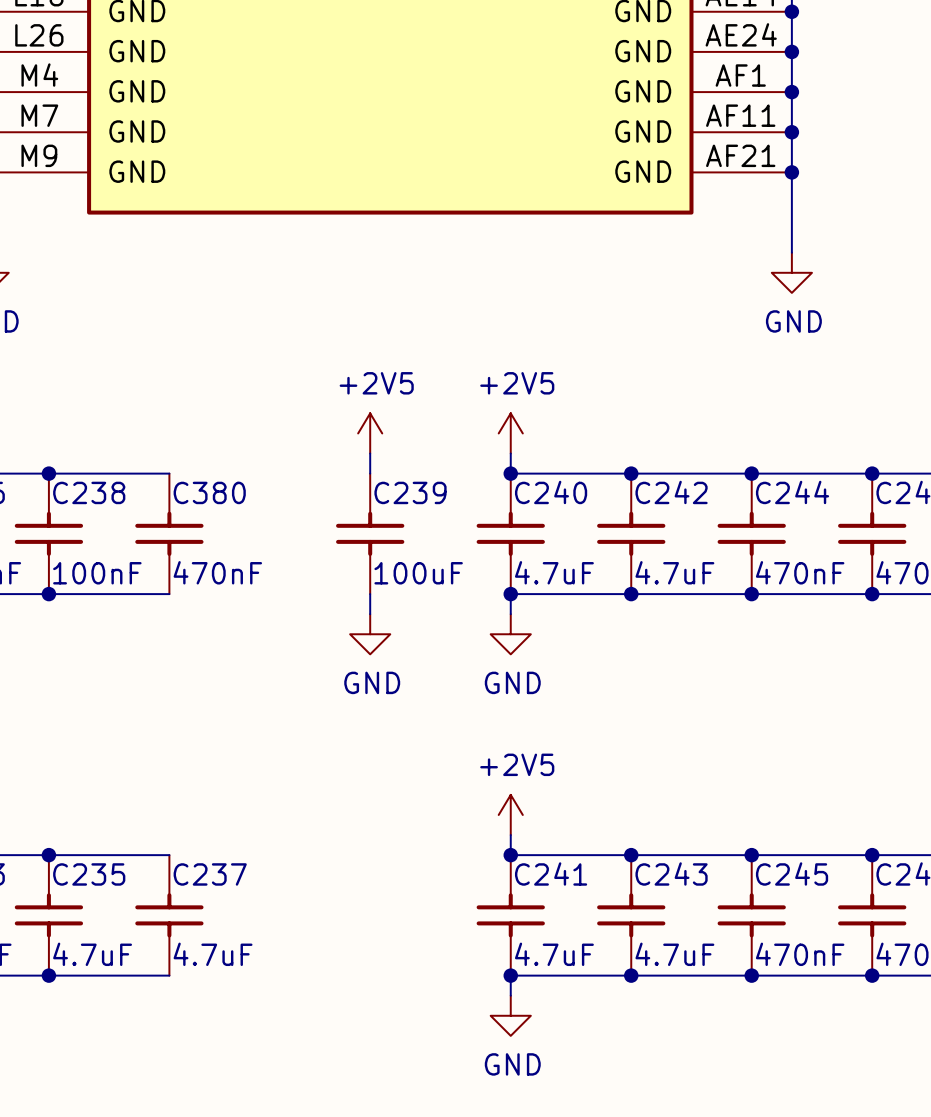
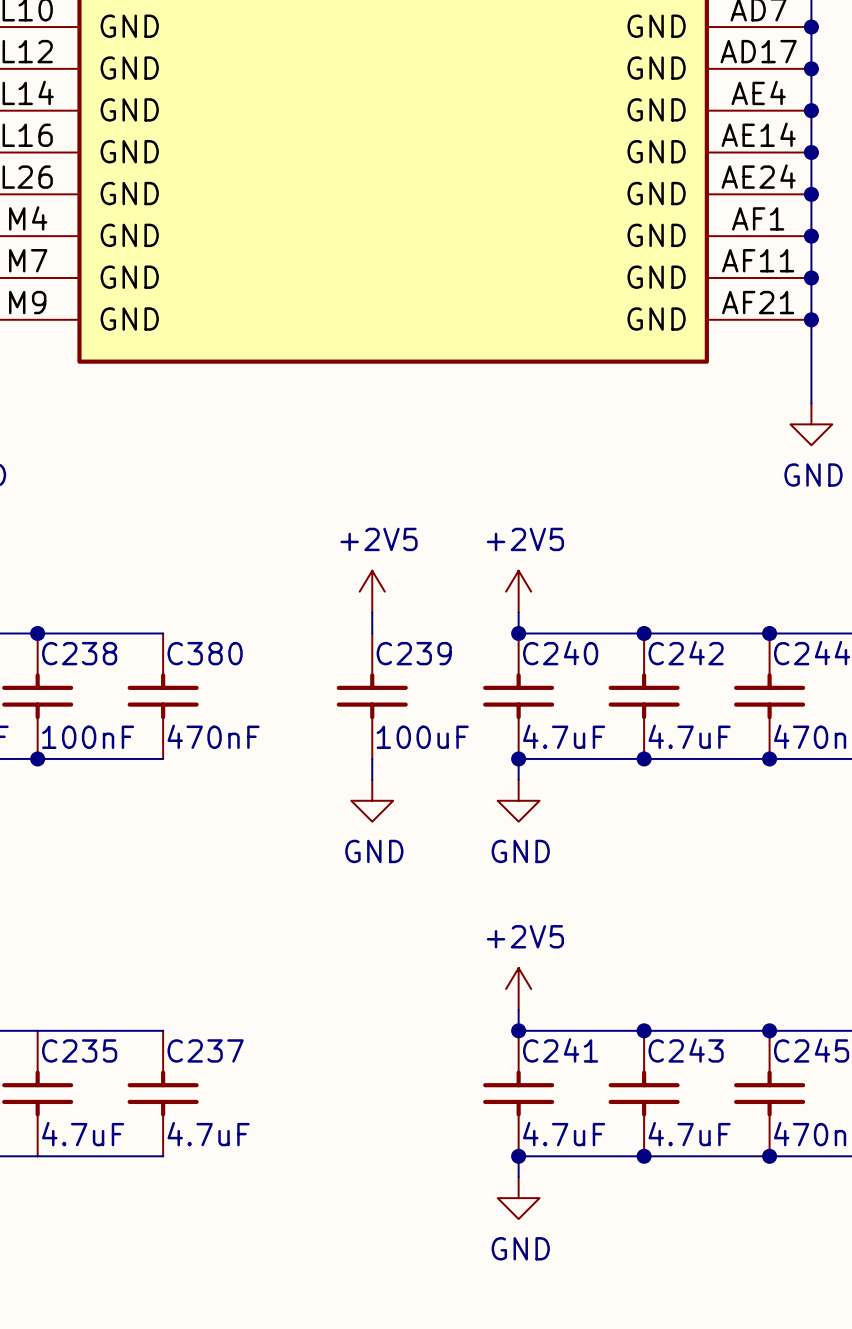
junction: (48, 855) -> none
junction: (48, 975) -> none

